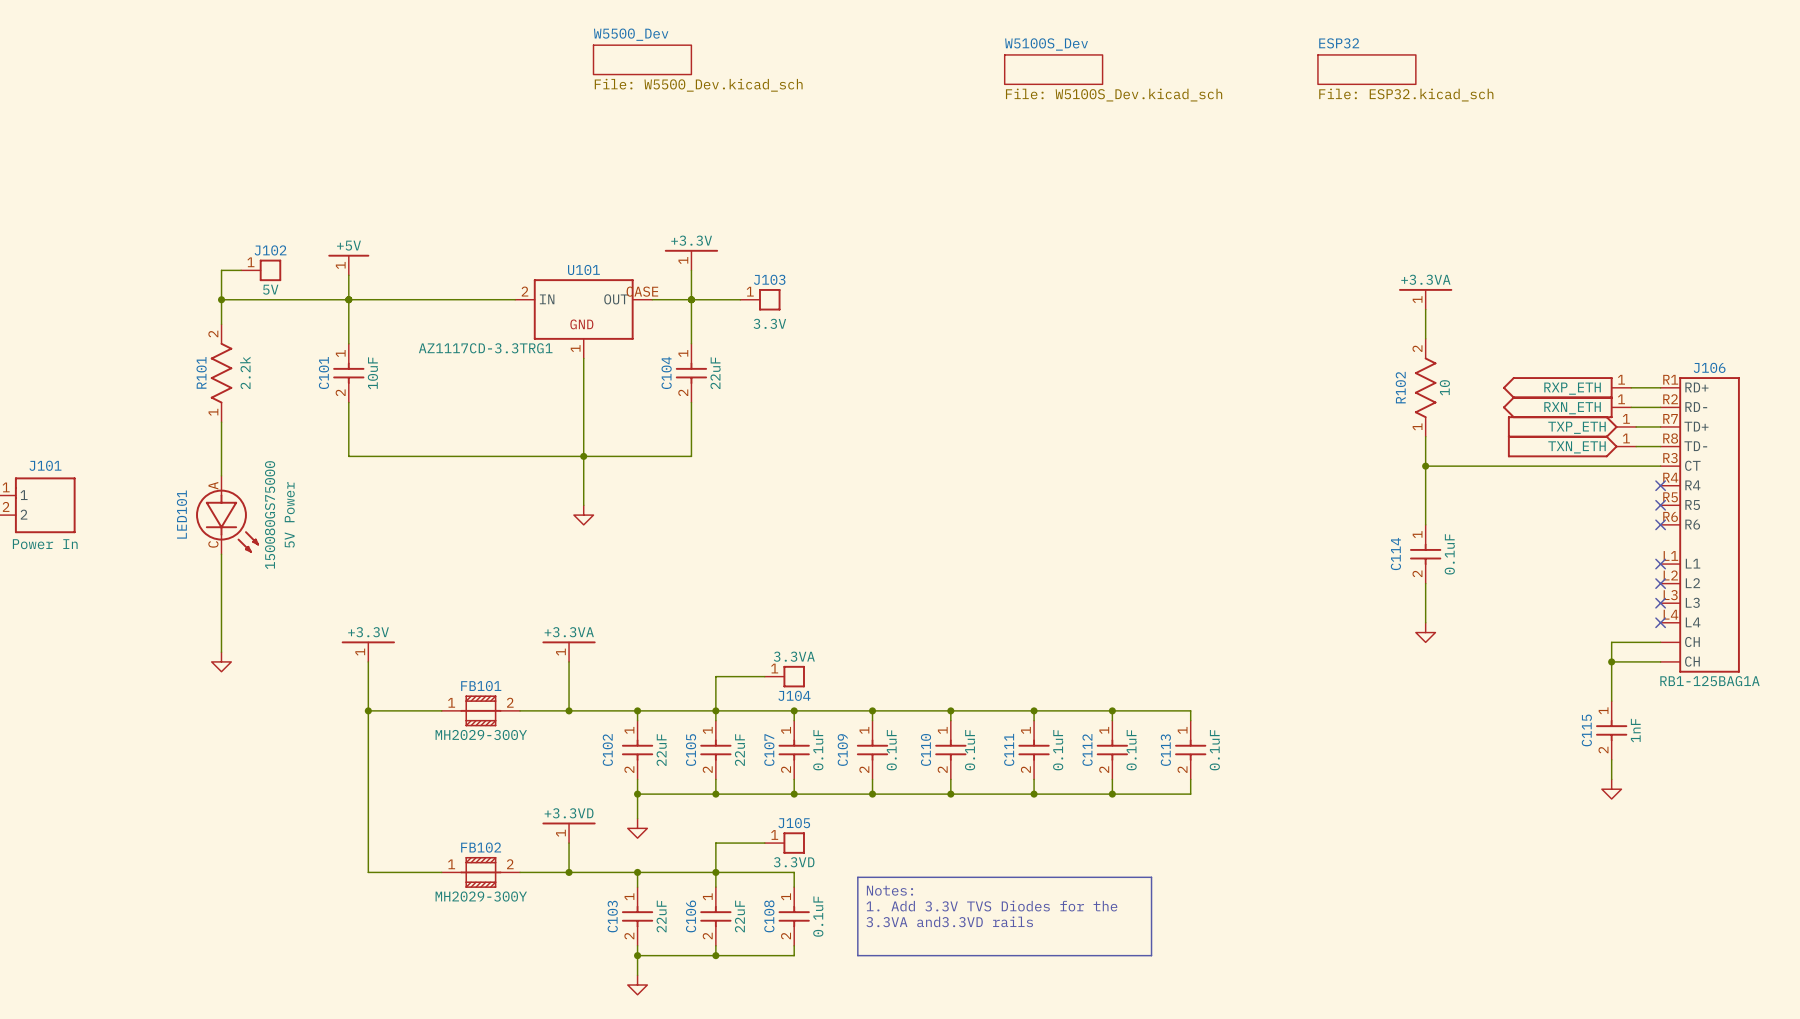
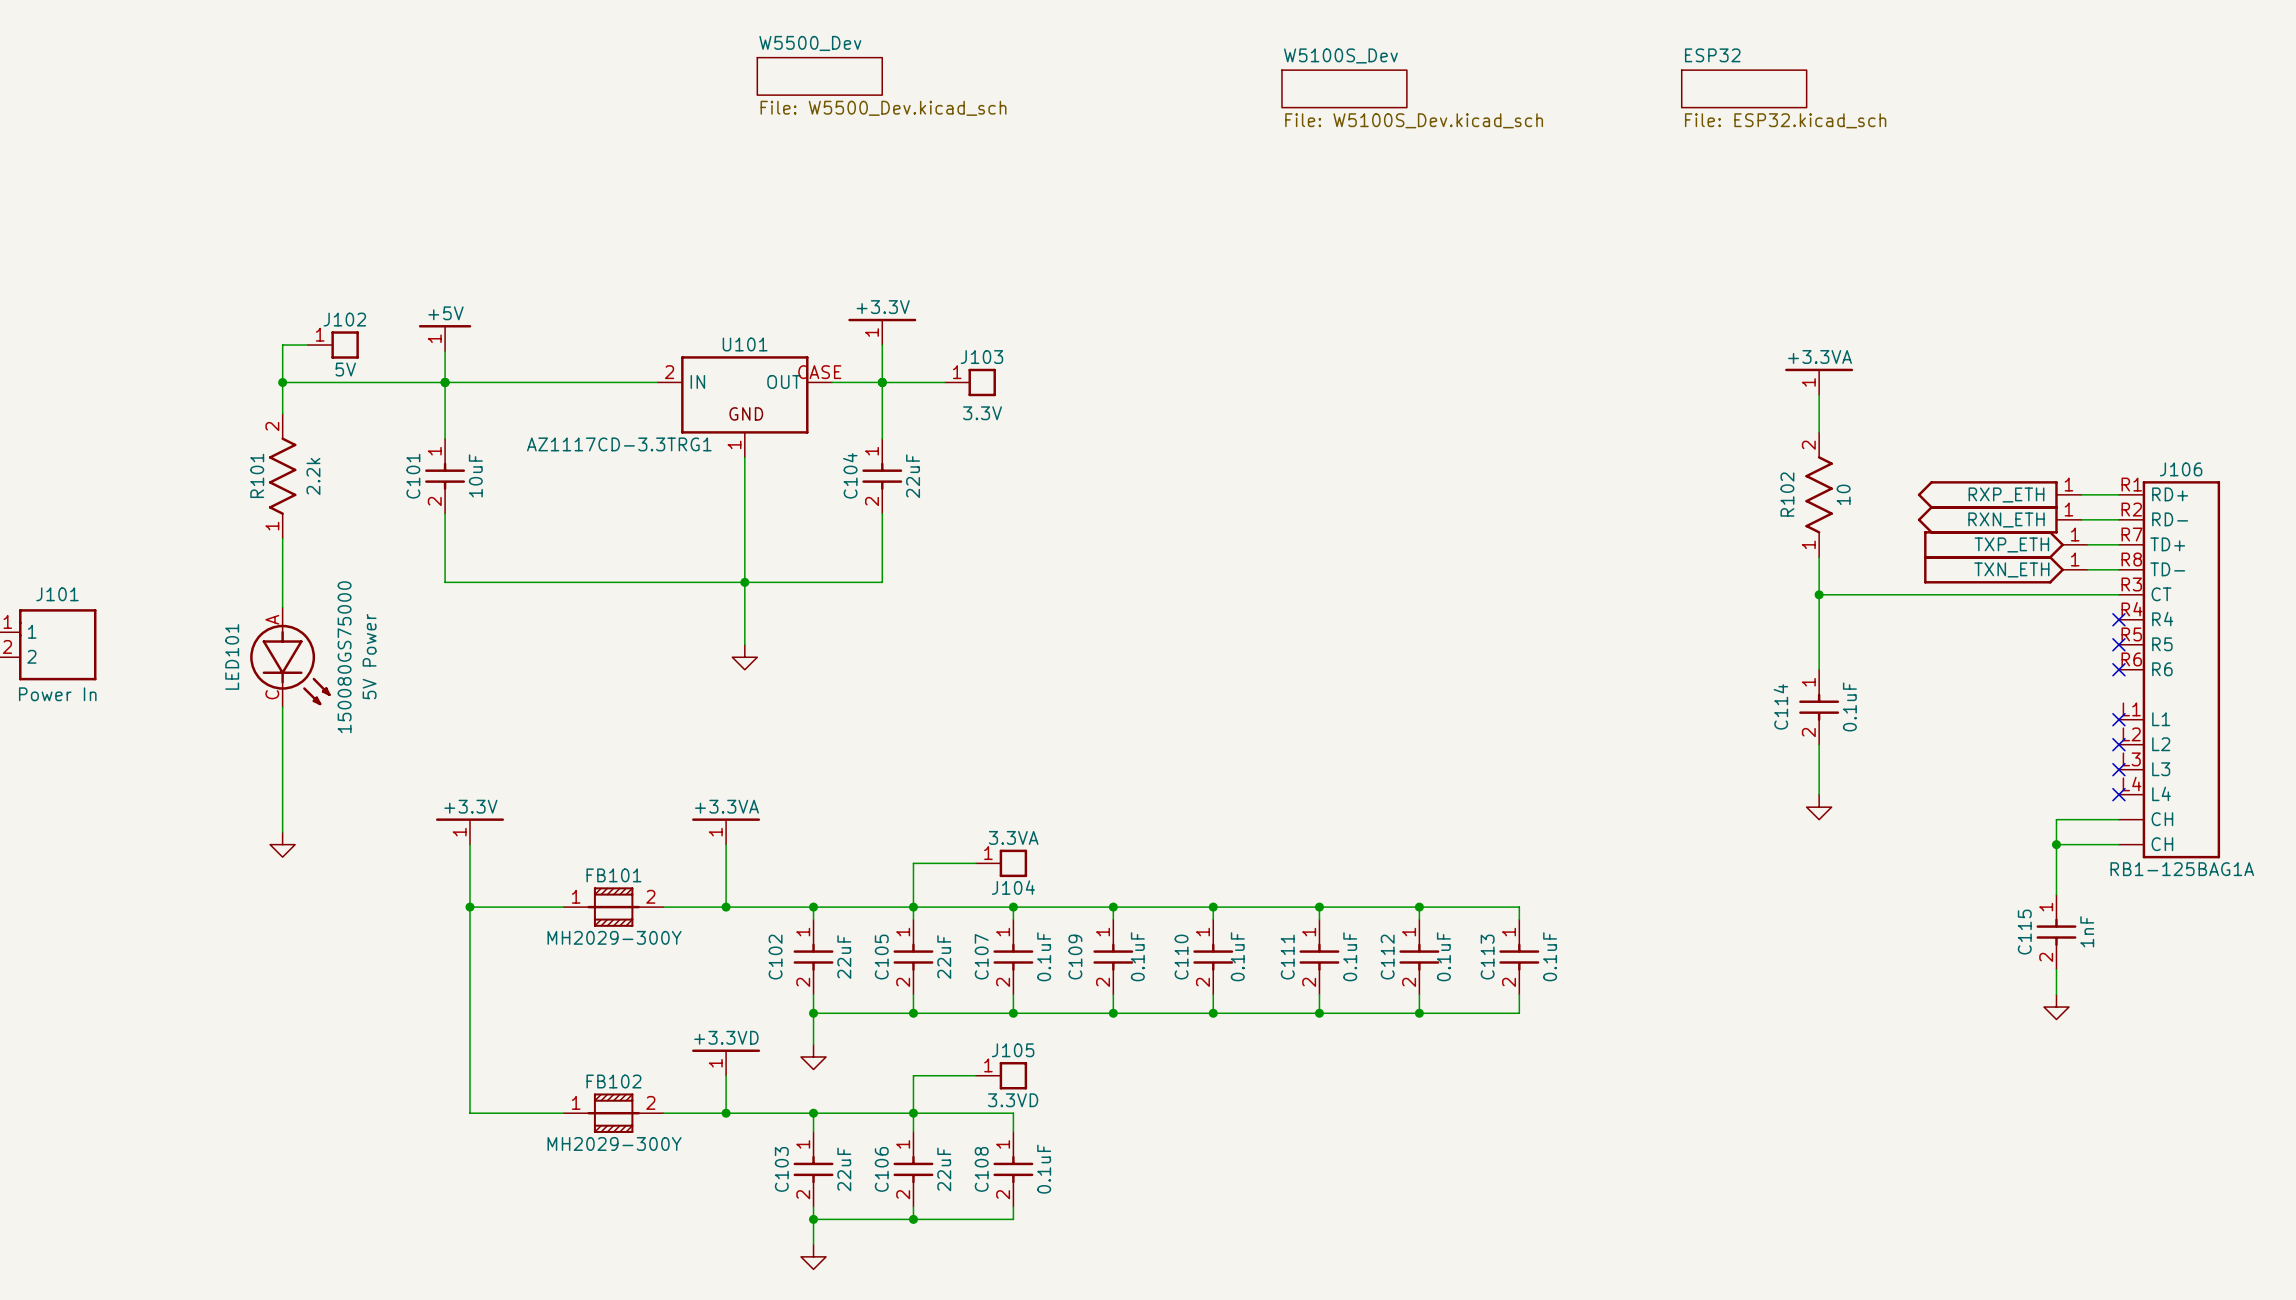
line: (857, 877) (1151, 877) (1151, 955) (857, 955) (857, 877) -> none
text: Notes: (889, 890) -> none
text: 1. Add 3.3V TVS Diodes for the (991, 906) -> none
text: 3.3VA and3.3VD rails (949, 921) -> none

